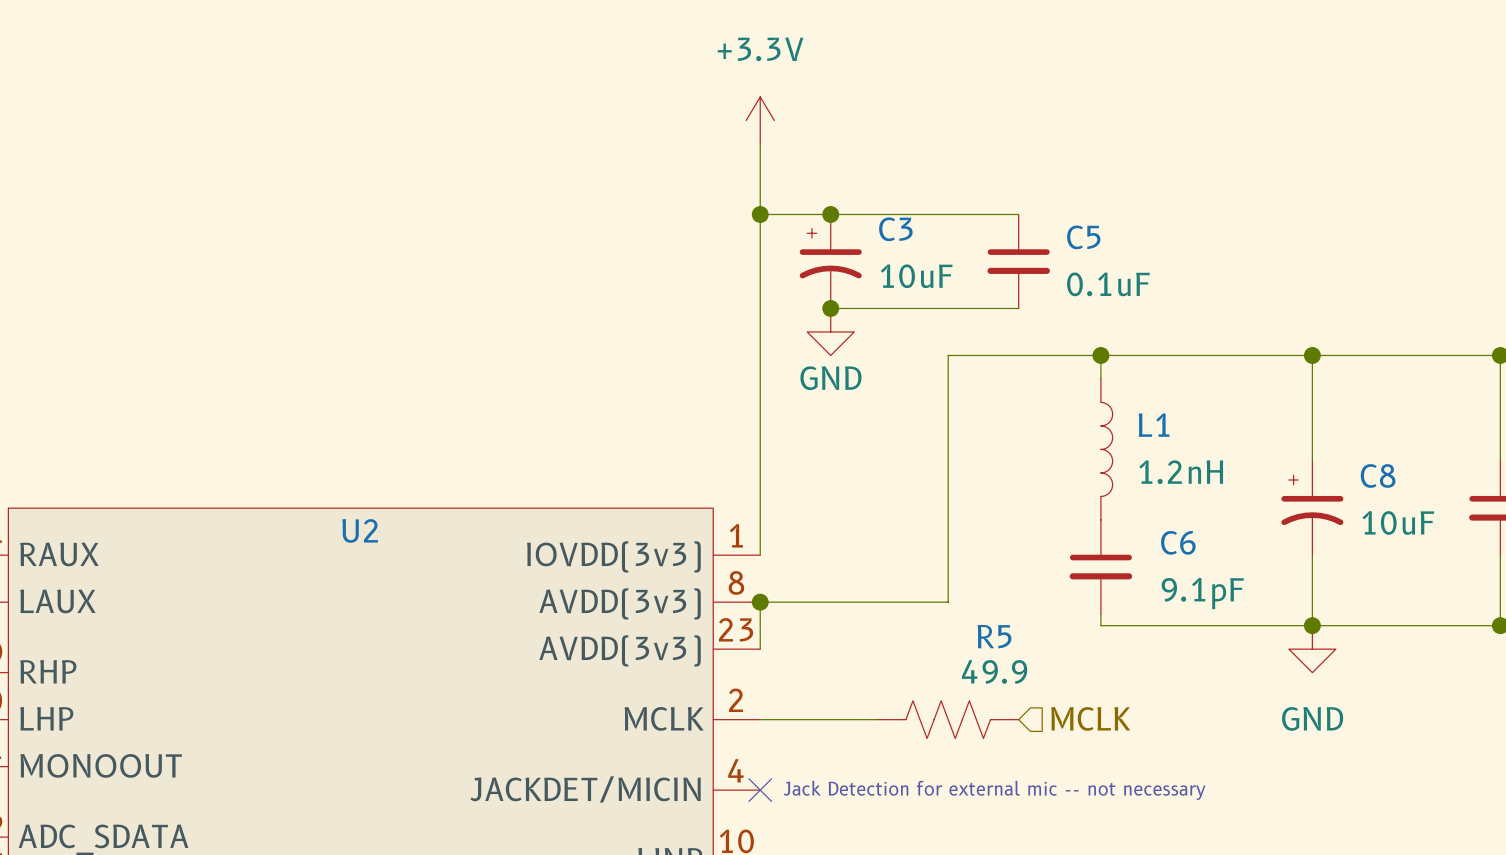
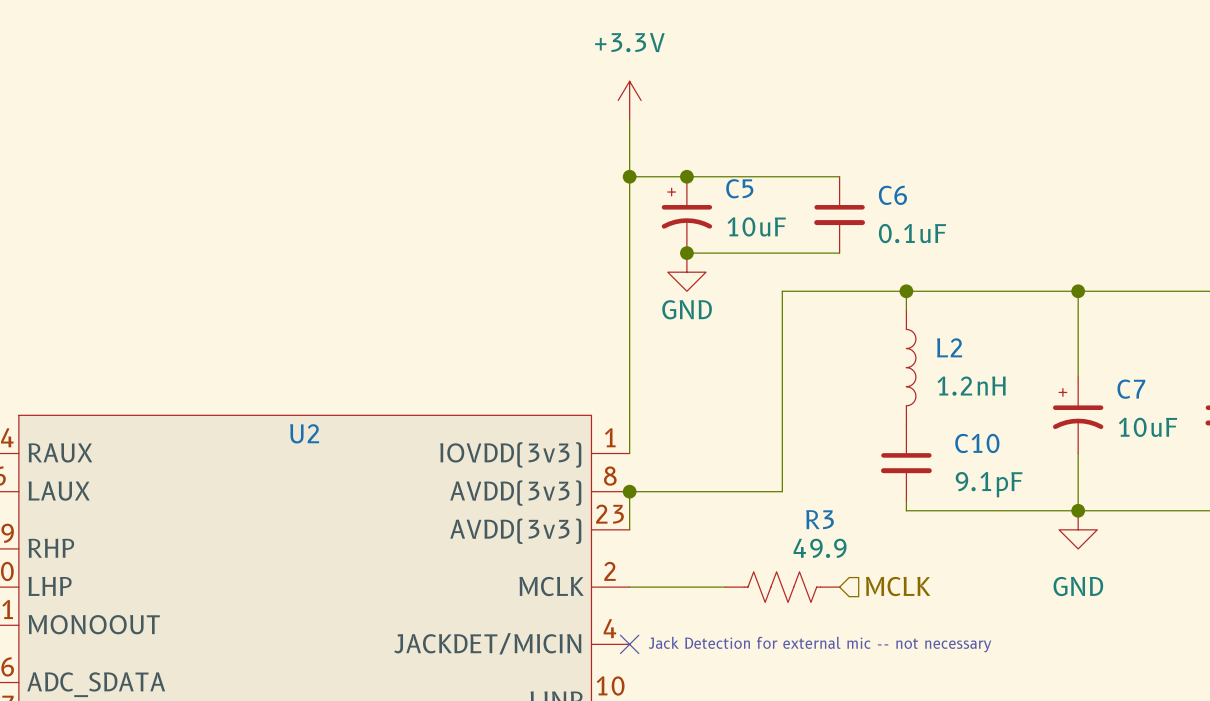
C3 name: C3 (895, 229) -> C5 (739, 188)
C5 name: C5 (1083, 237) -> C6 (892, 195)
L1 name: L1 (1154, 425) -> L2 (949, 347)
C8 name: C8 (1378, 475) -> C7 (1131, 389)
C6 name: C6 (1178, 542) -> C10 (977, 443)
R5 name: R5 (994, 636) -> R3 (819, 519)

